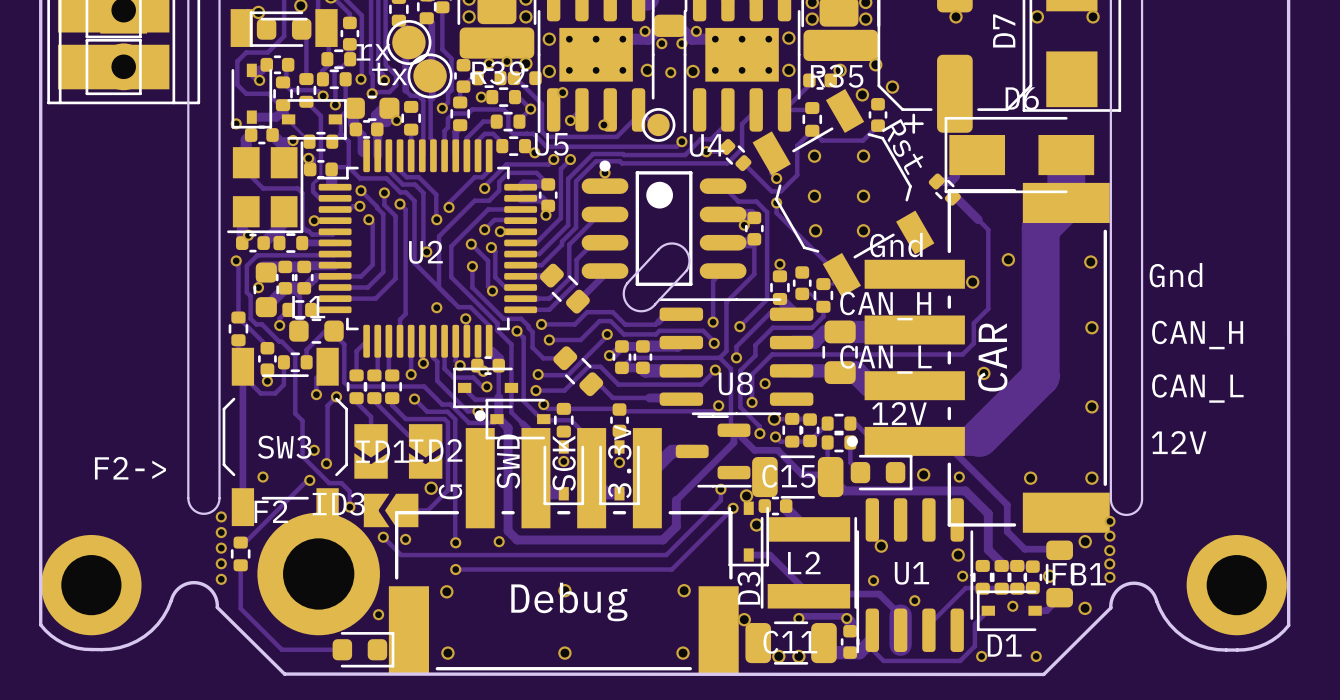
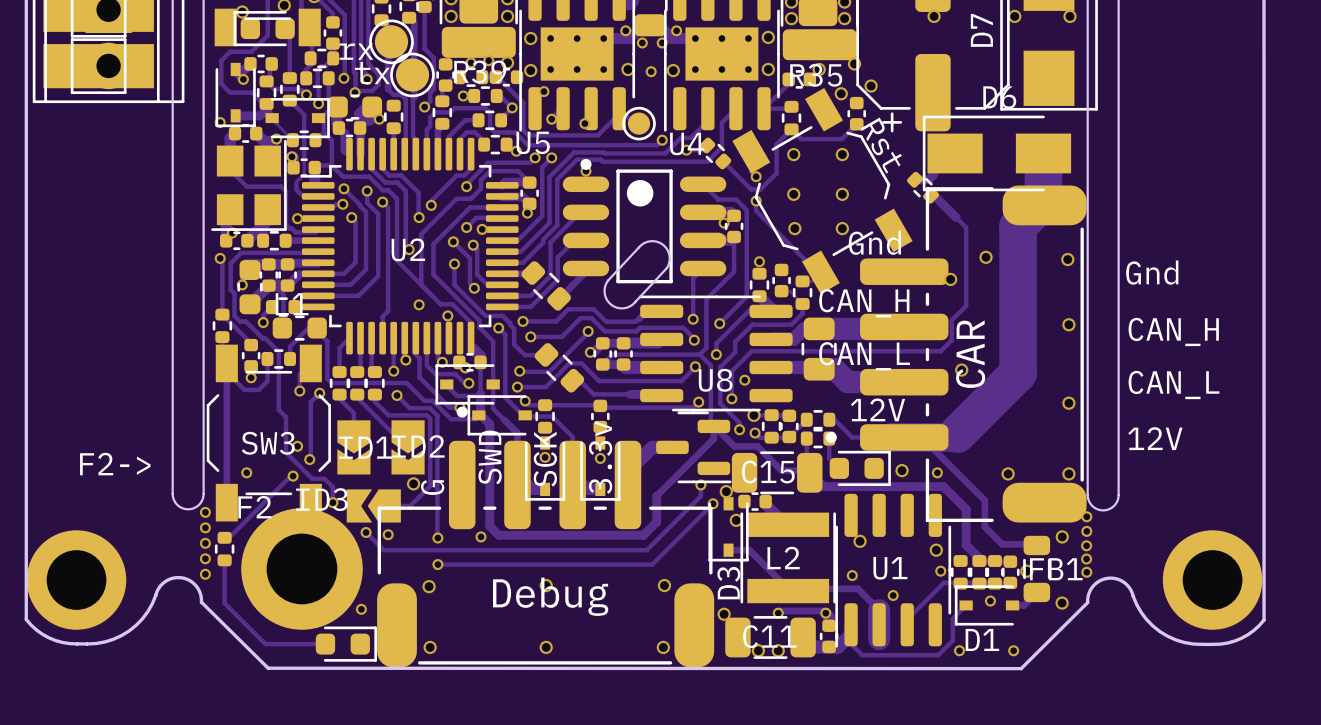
part footprint: [846, 182, 1110, 533] -> [825, 185, 1087, 523]
part footprint: [388, 410, 739, 674] -> [377, 406, 715, 668]

